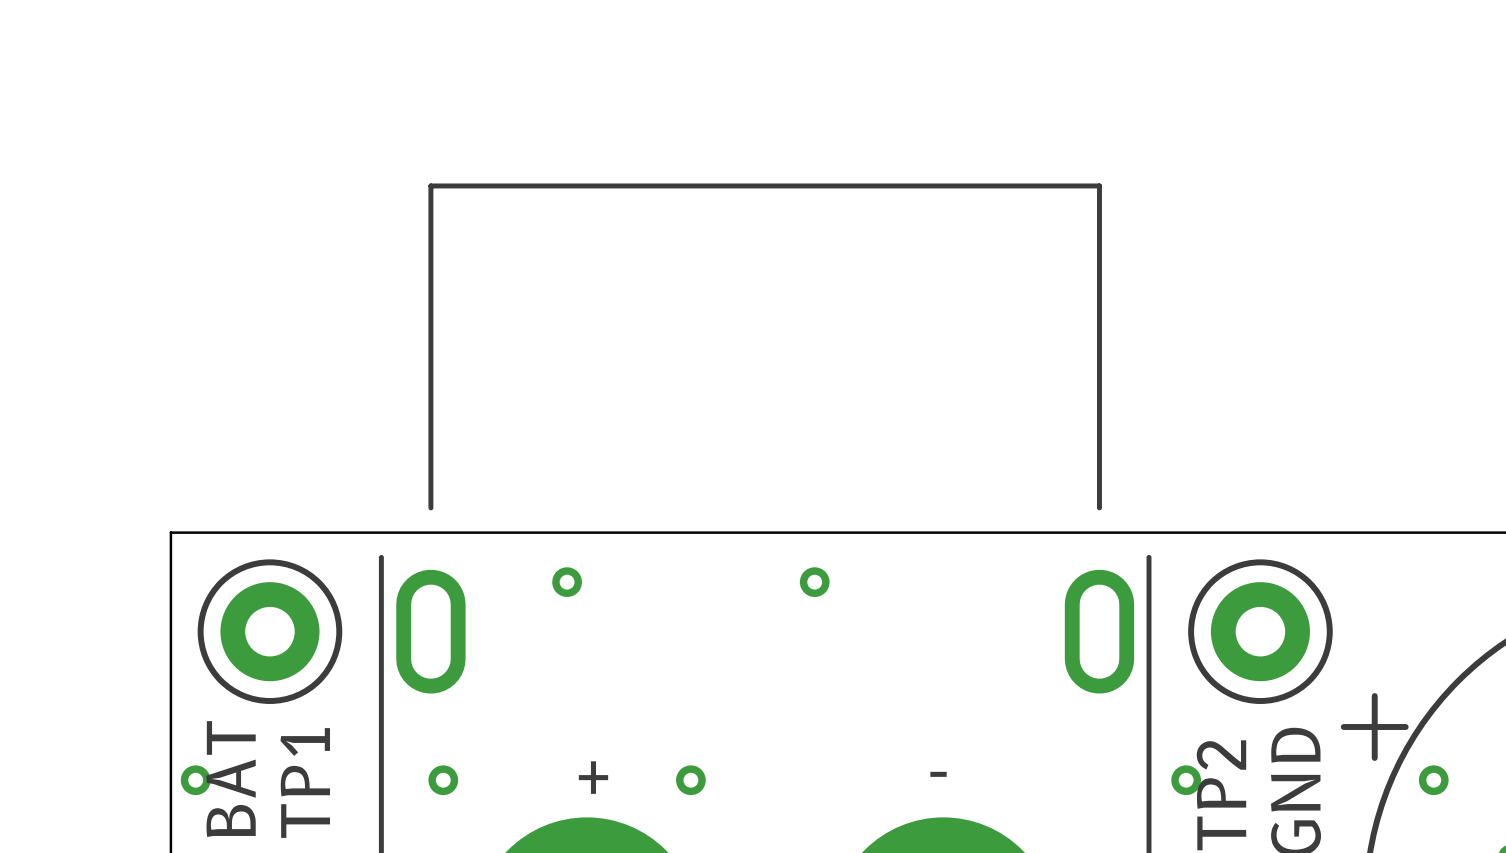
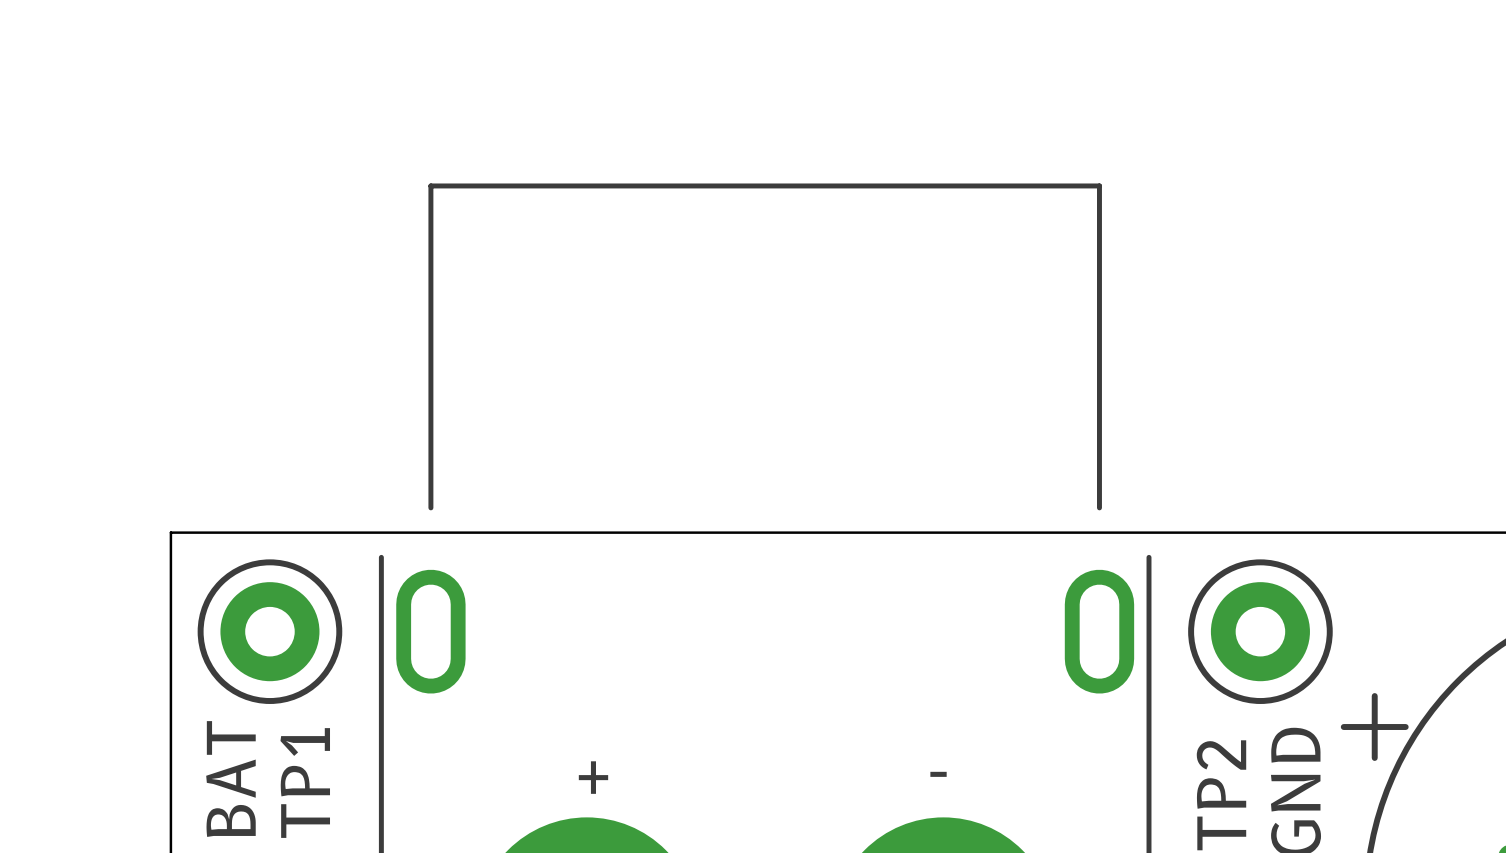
via: (567, 582) -> none
via: (814, 582) -> none
via: (195, 780) -> none
via: (443, 780) -> none
via: (690, 780) -> none
via: (1186, 780) -> none
via: (1433, 780) -> none

